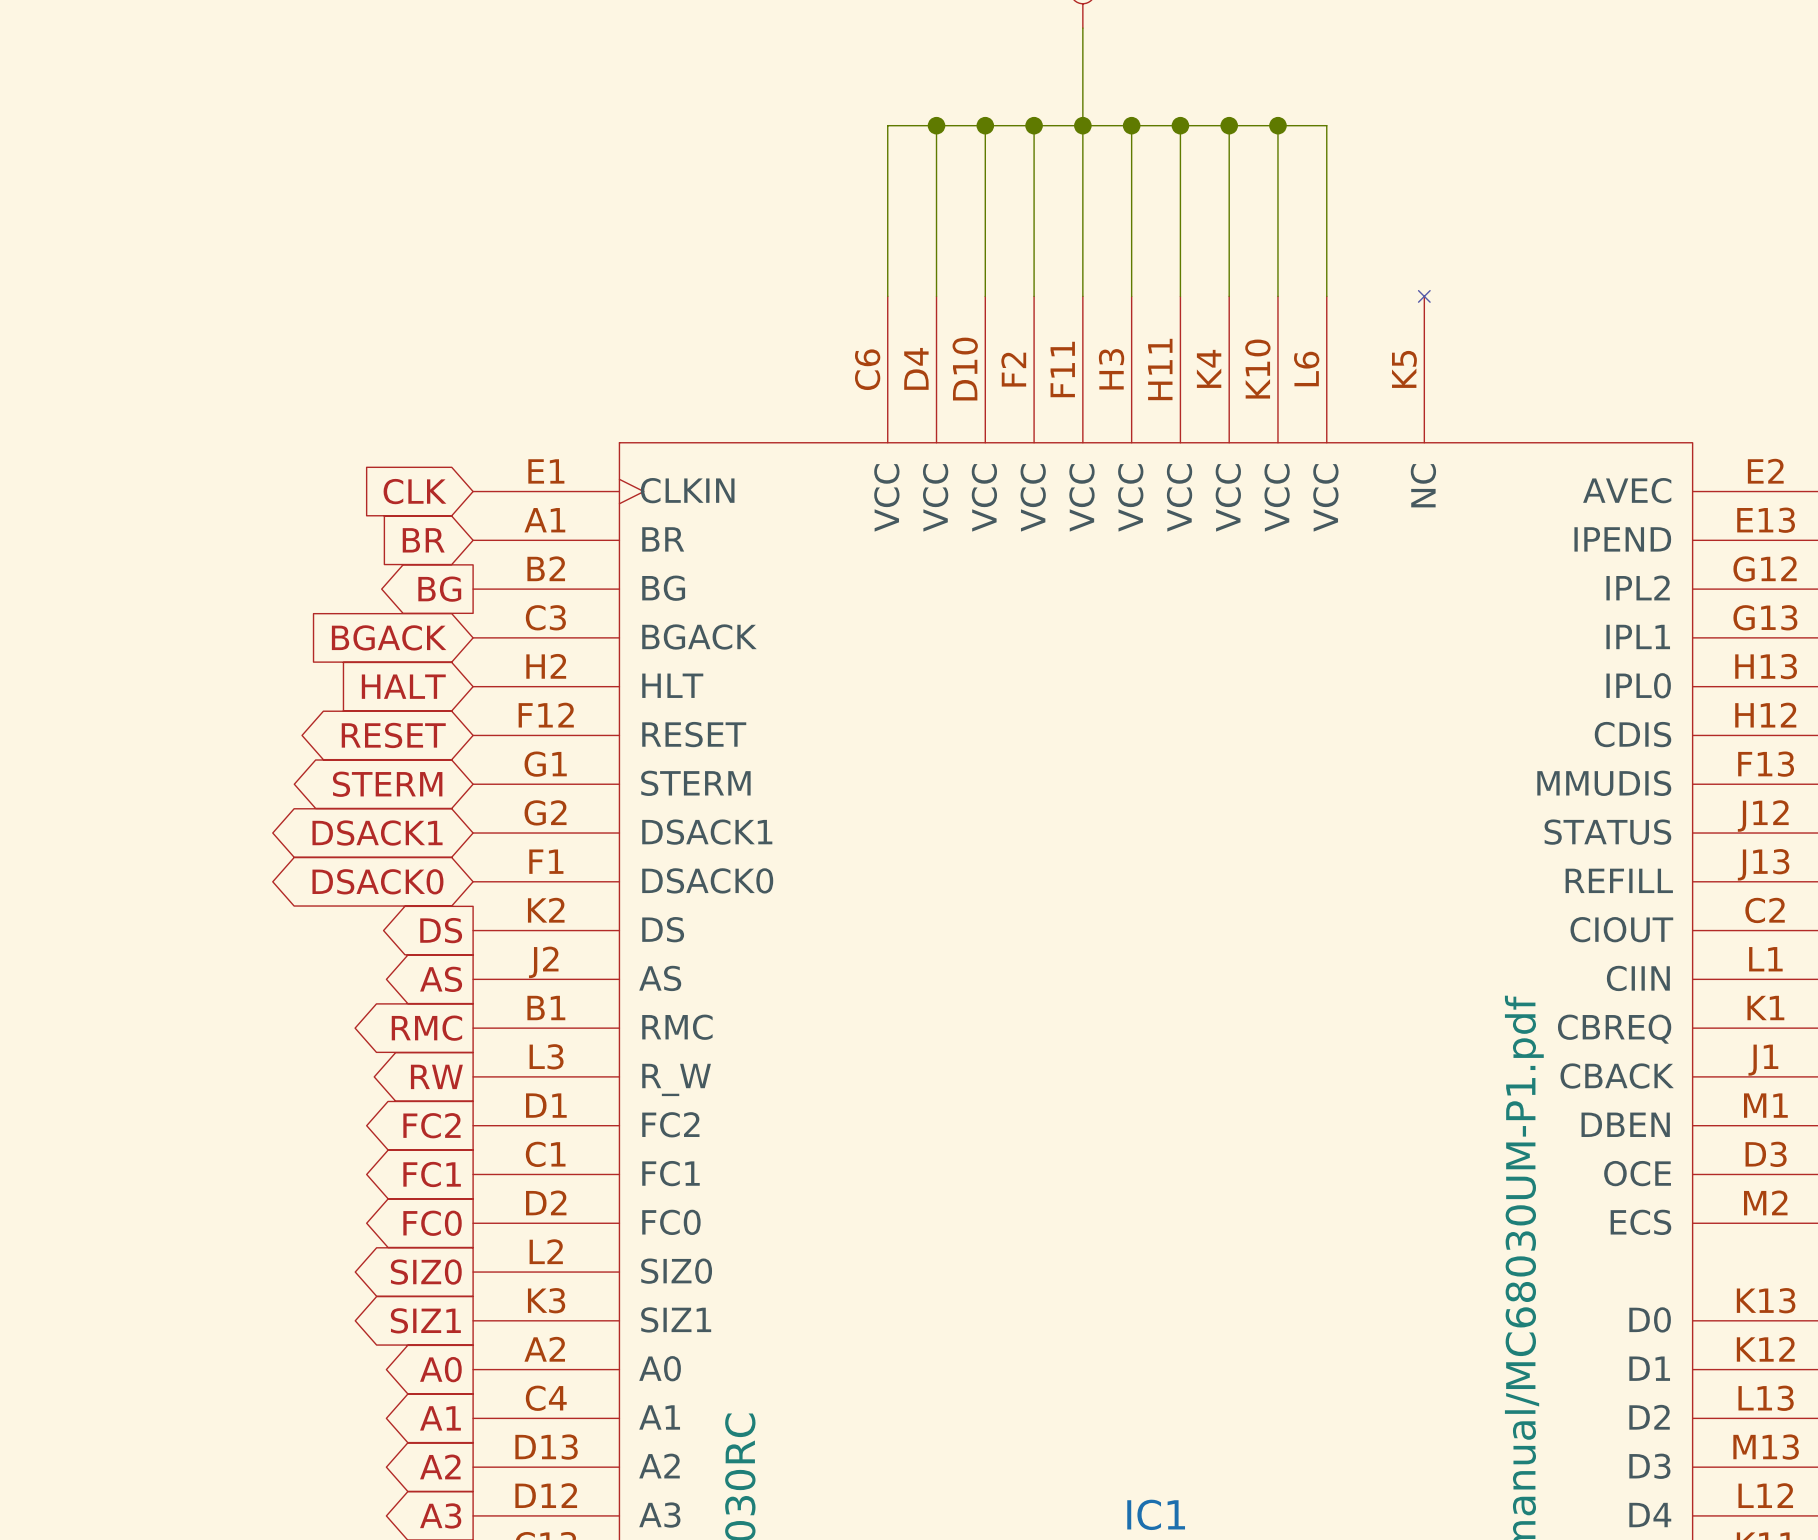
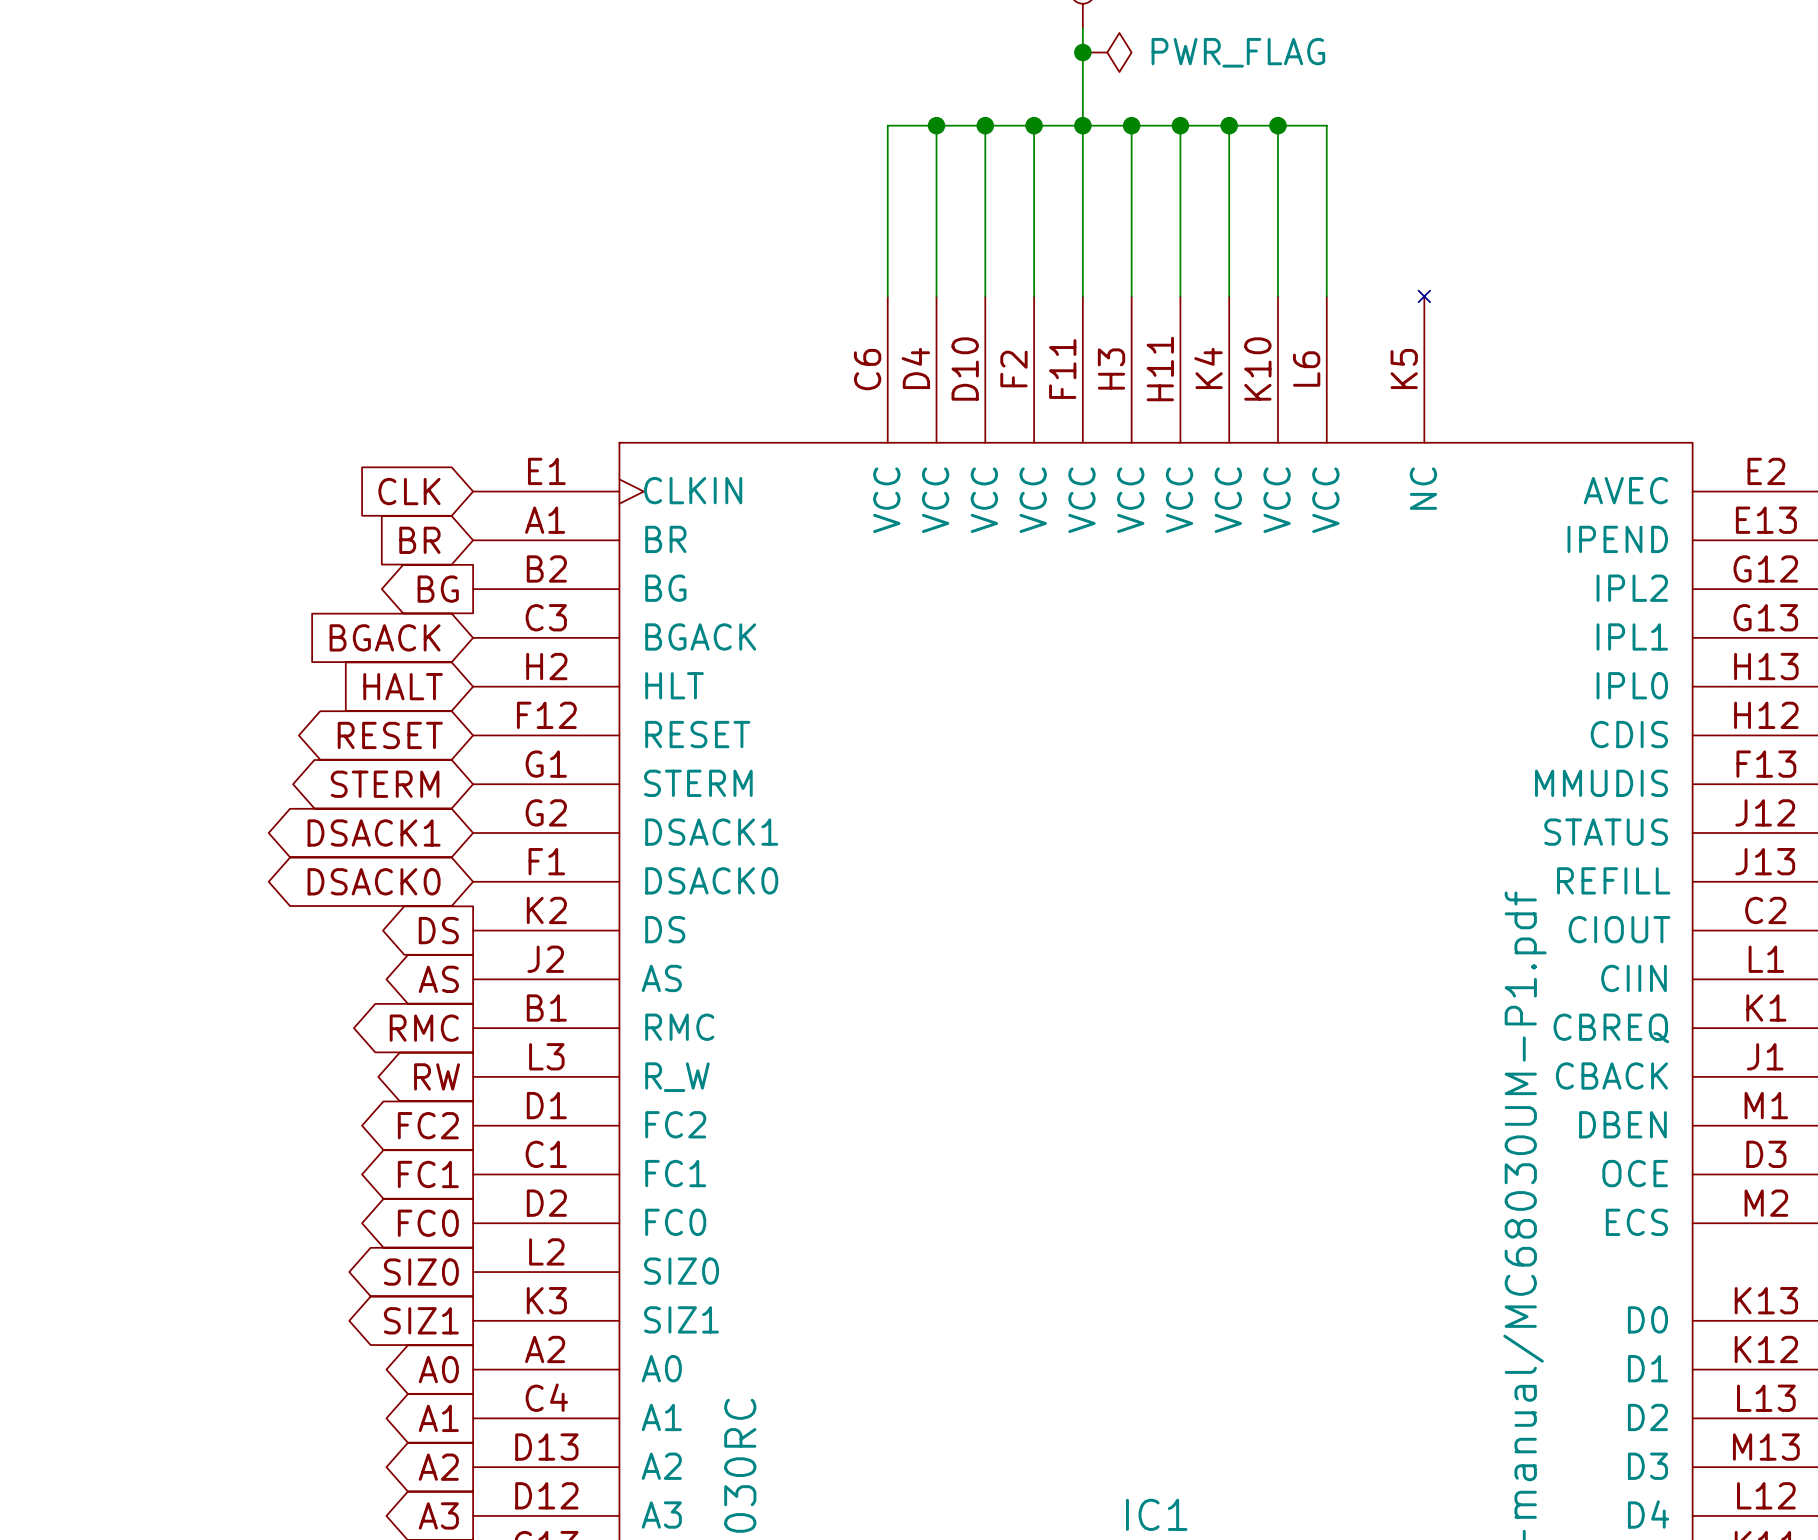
junction: none -> (1082, 52)
power symbol: none -> PWR_FLAG (1107, 52)

